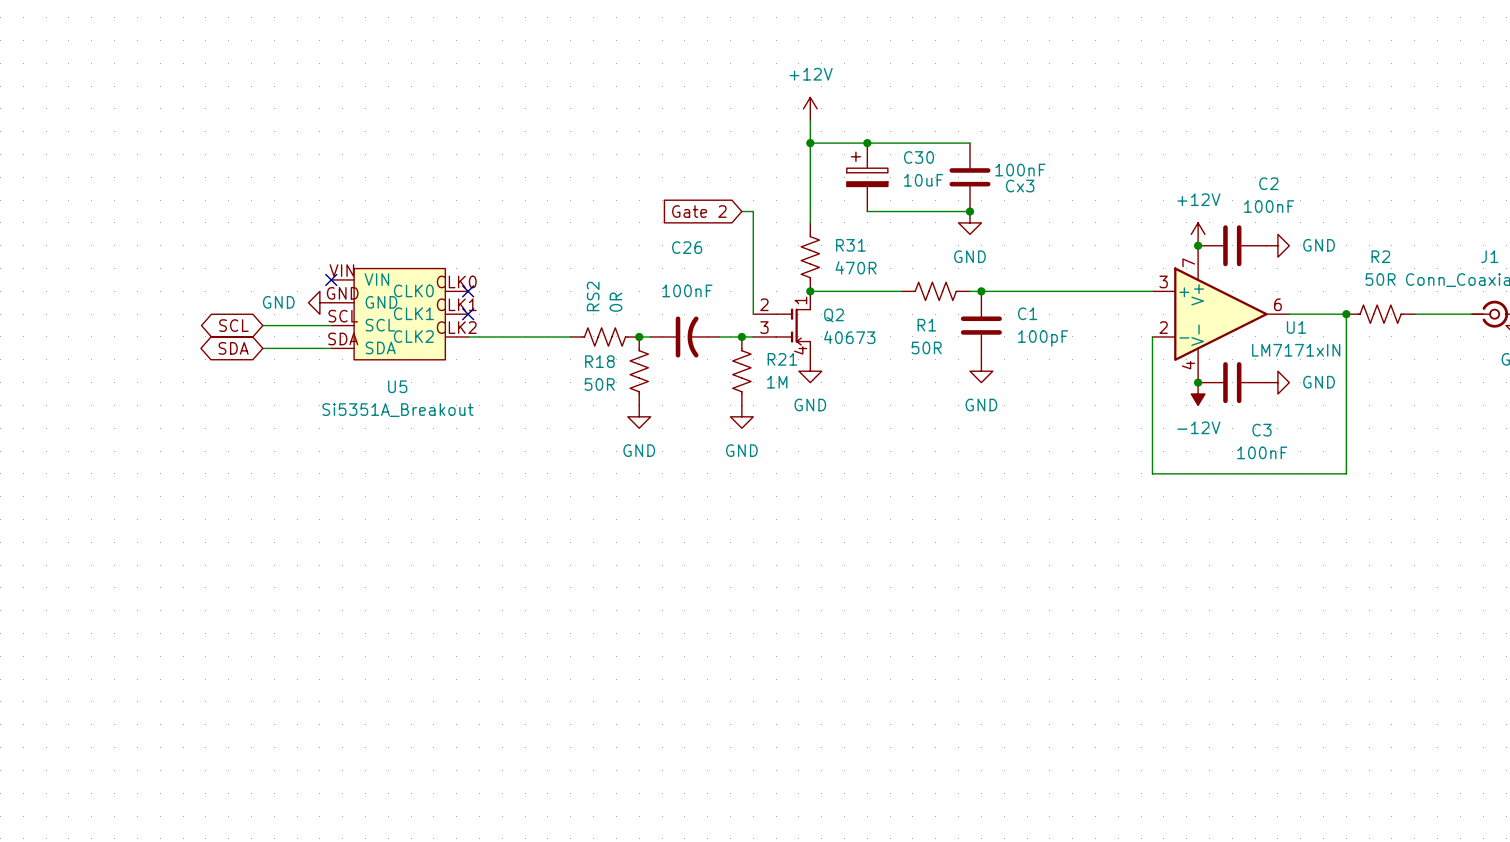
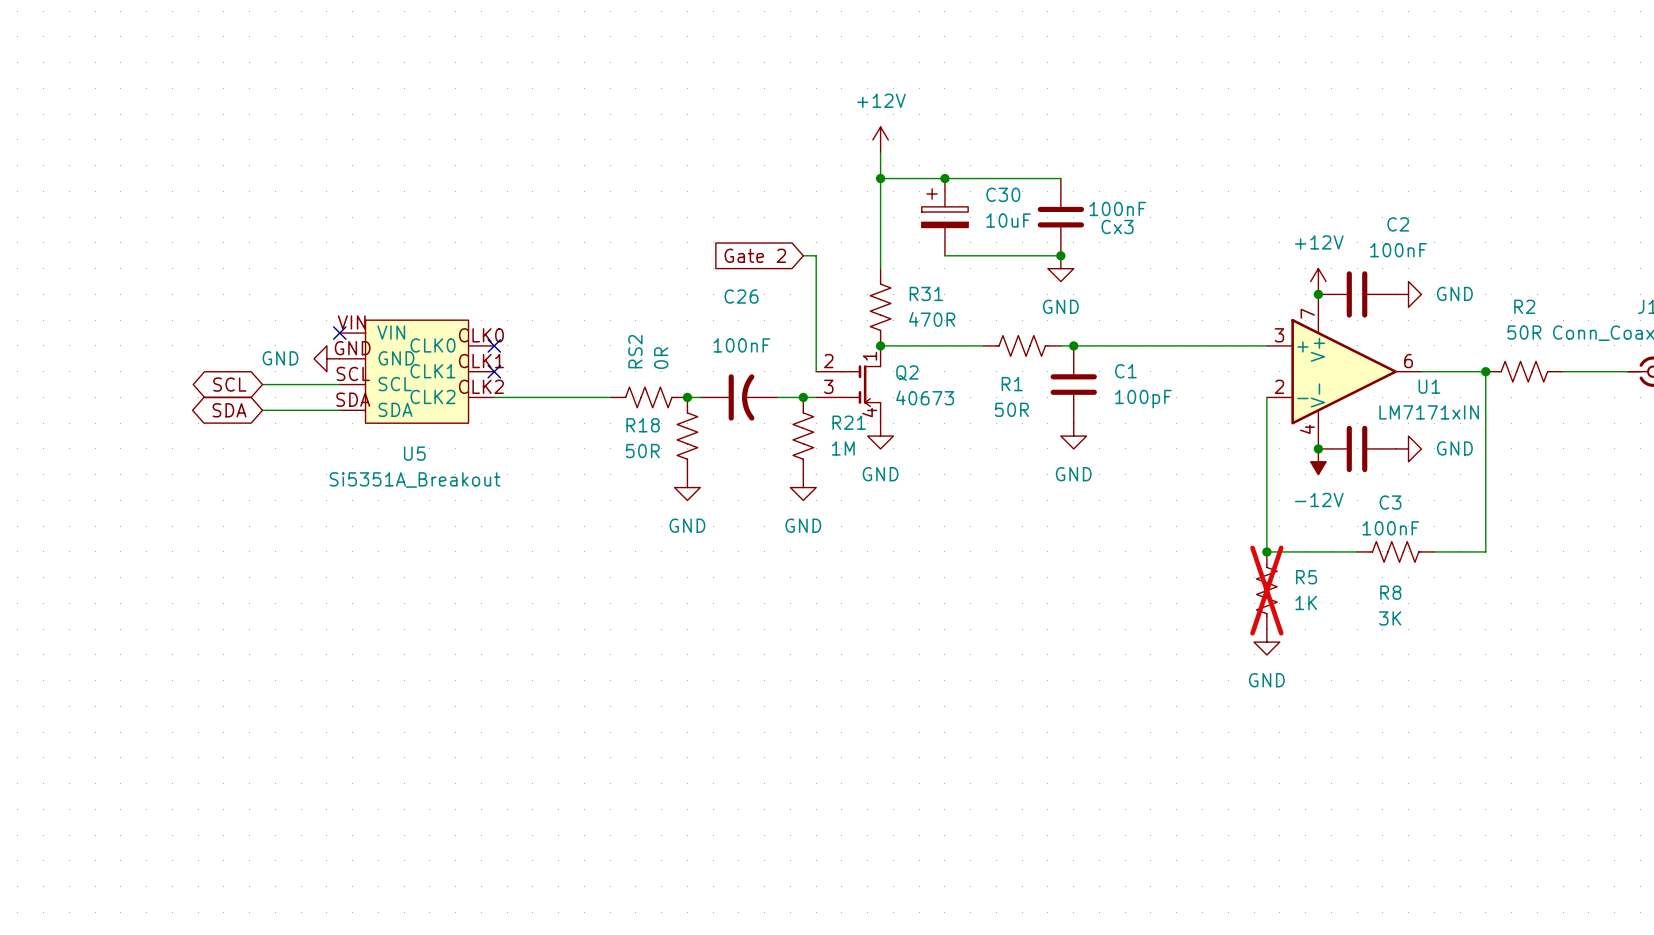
junction: none -> (1266, 551)
R8: none -> 3K (1395, 551)
R5: none -> 1K (1266, 590)
power symbol: none -> GND (1266, 642)

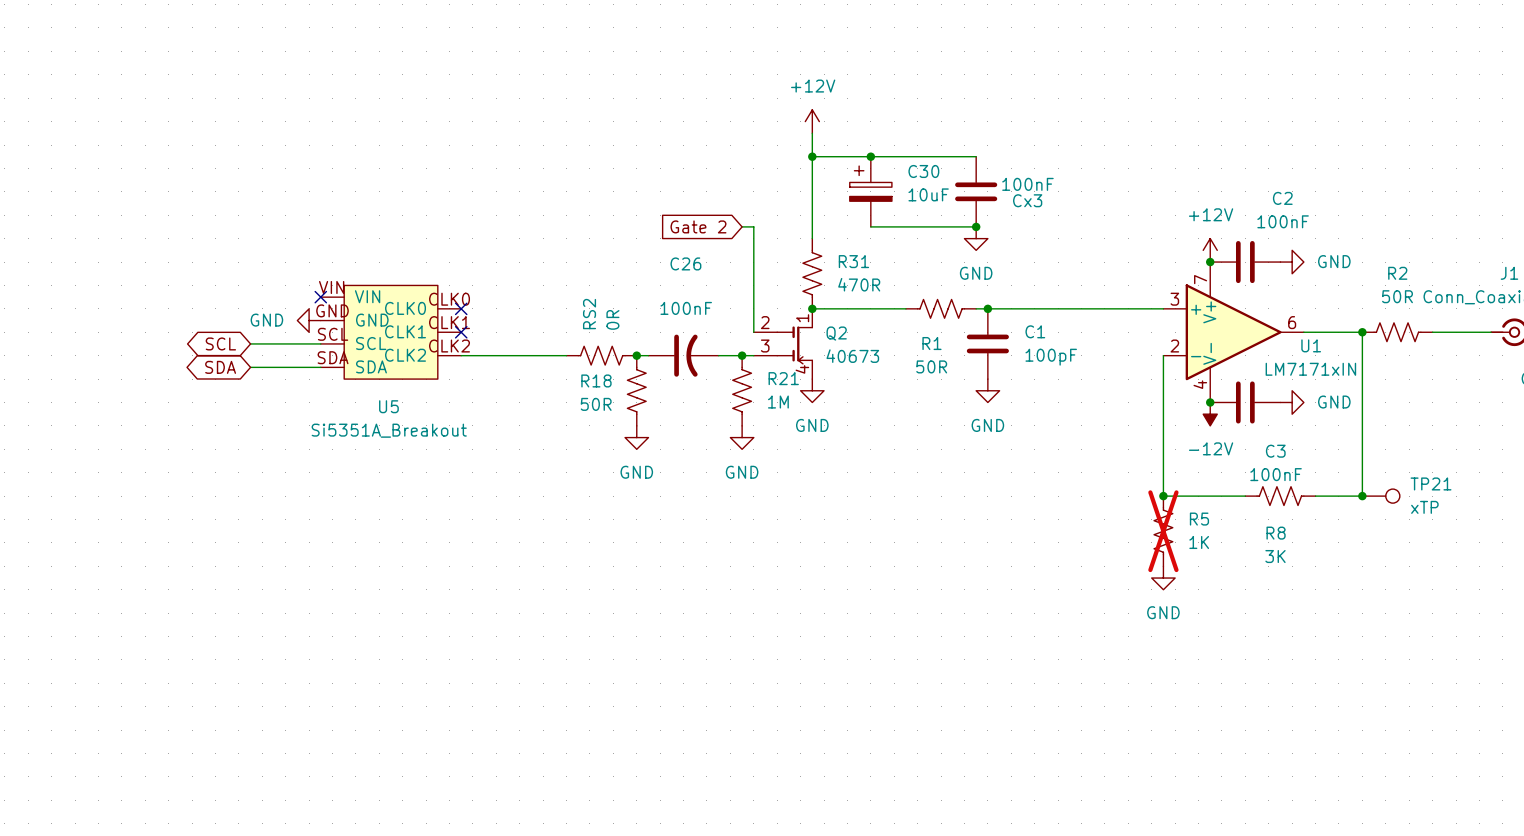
junction: none -> (1362, 496)
TP21: none -> xTP (1381, 496)

